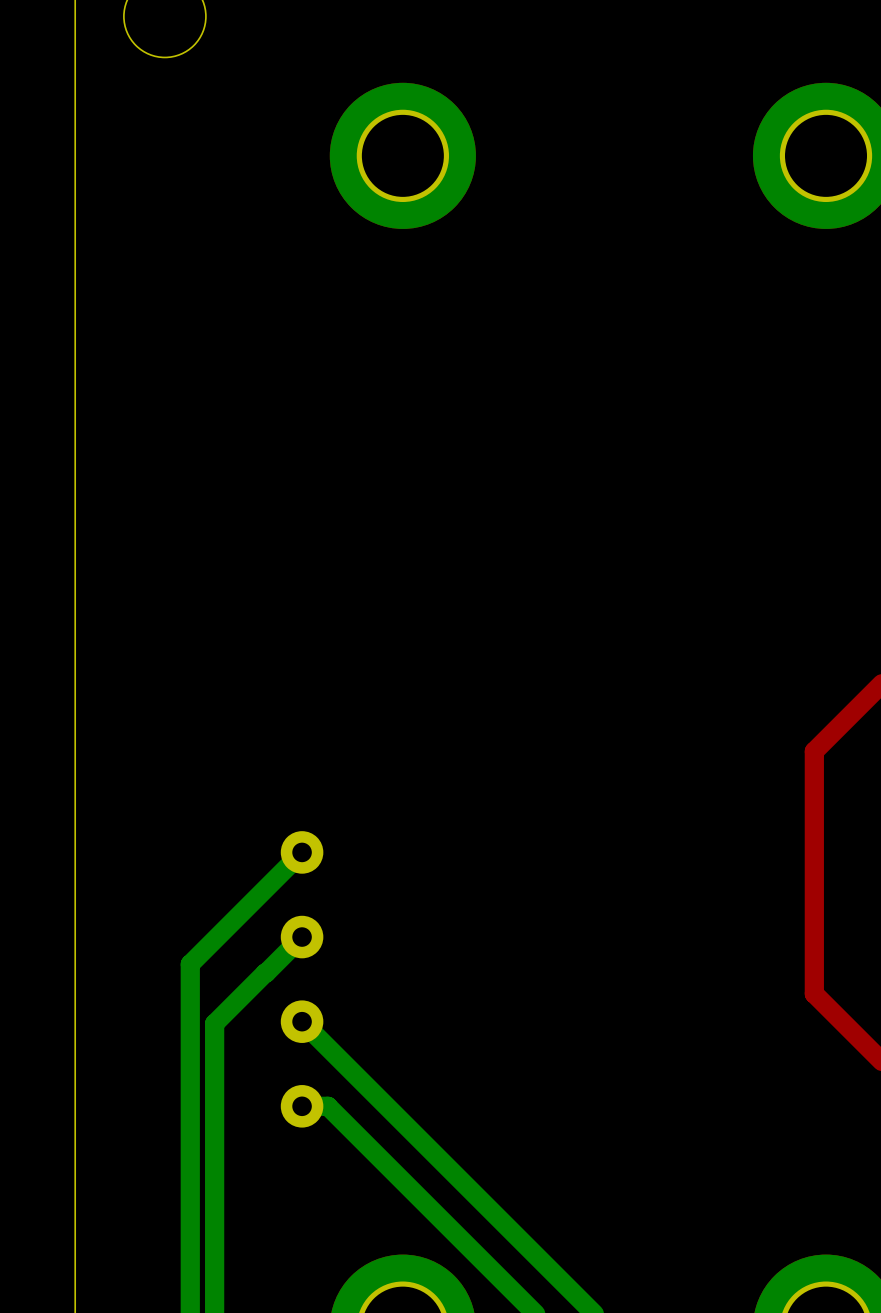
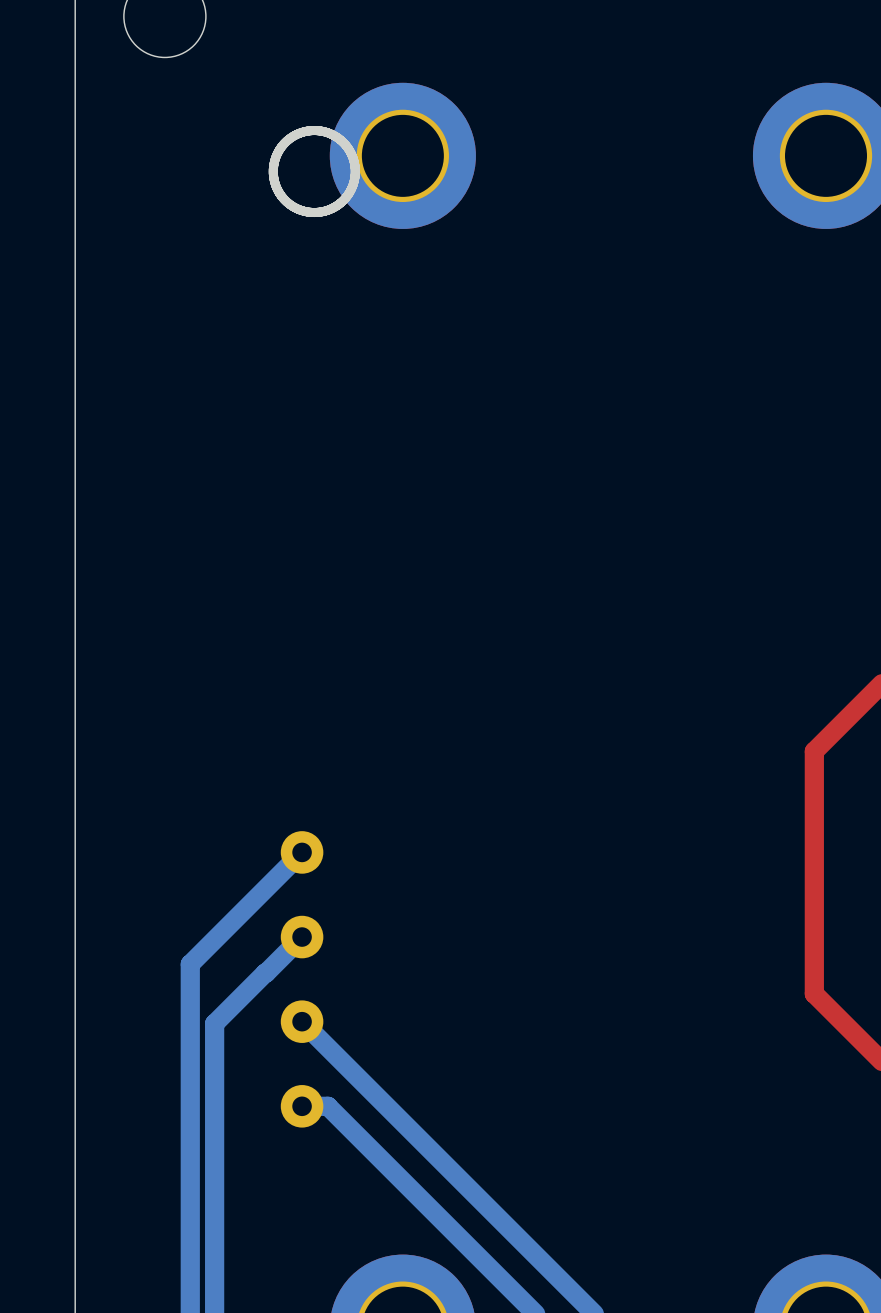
round board edge: none -> [268, 126, 360, 218]

